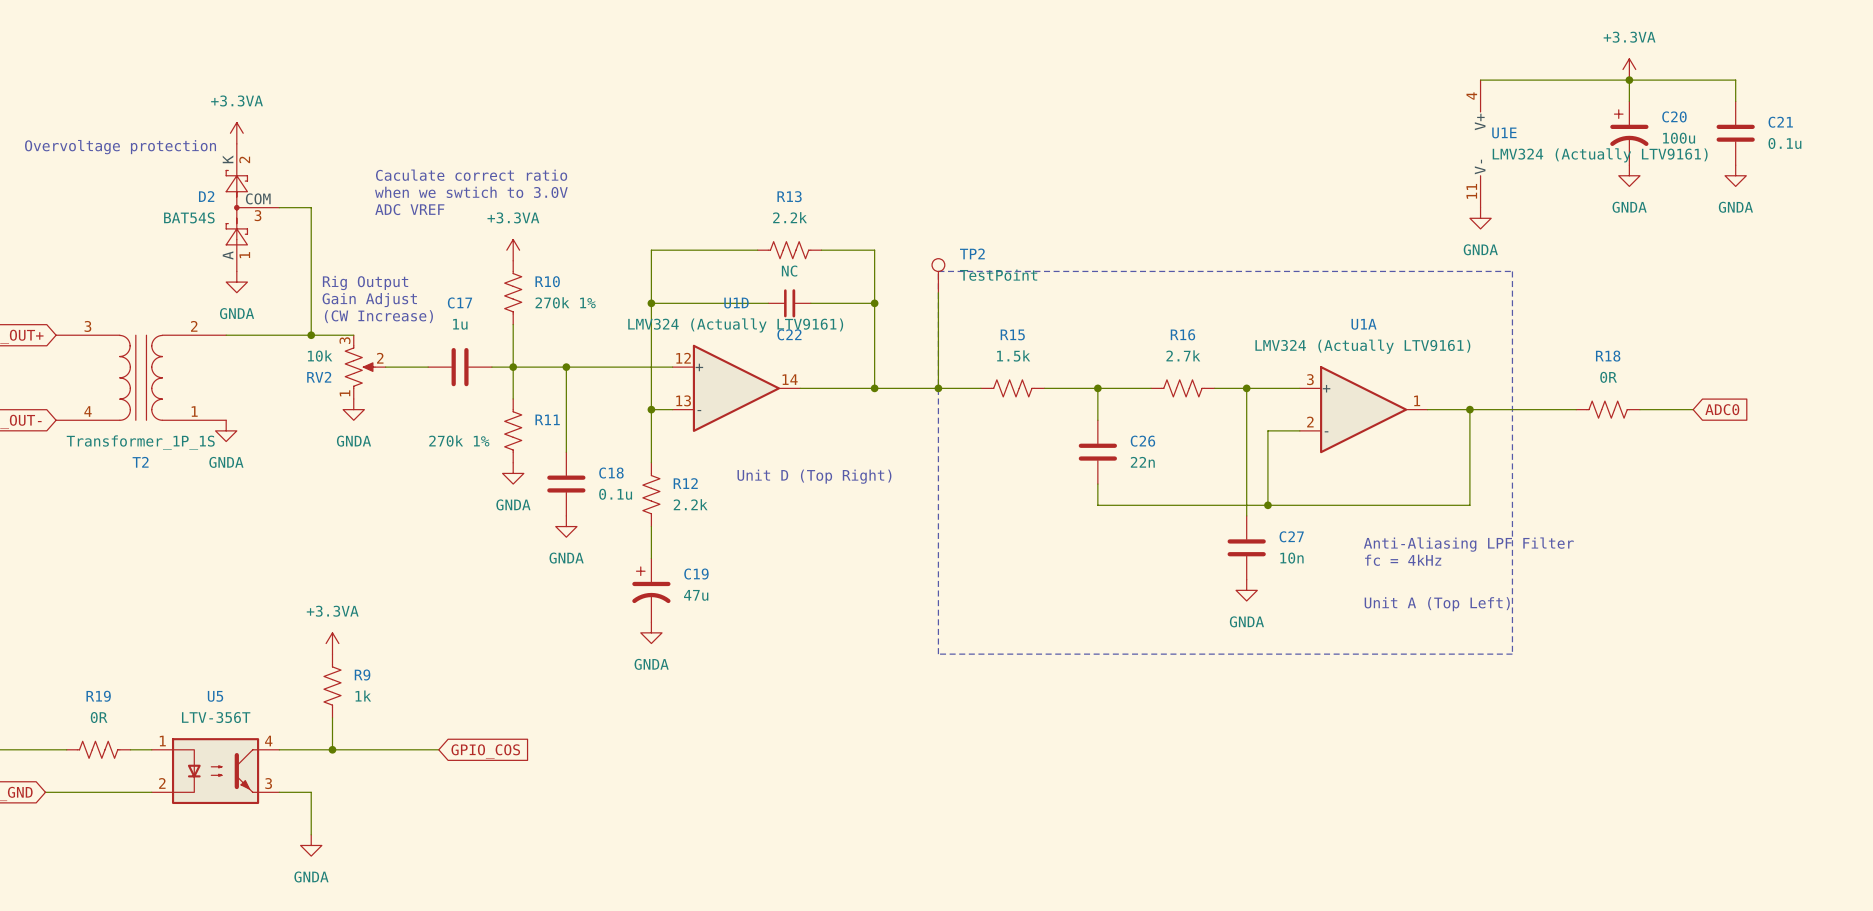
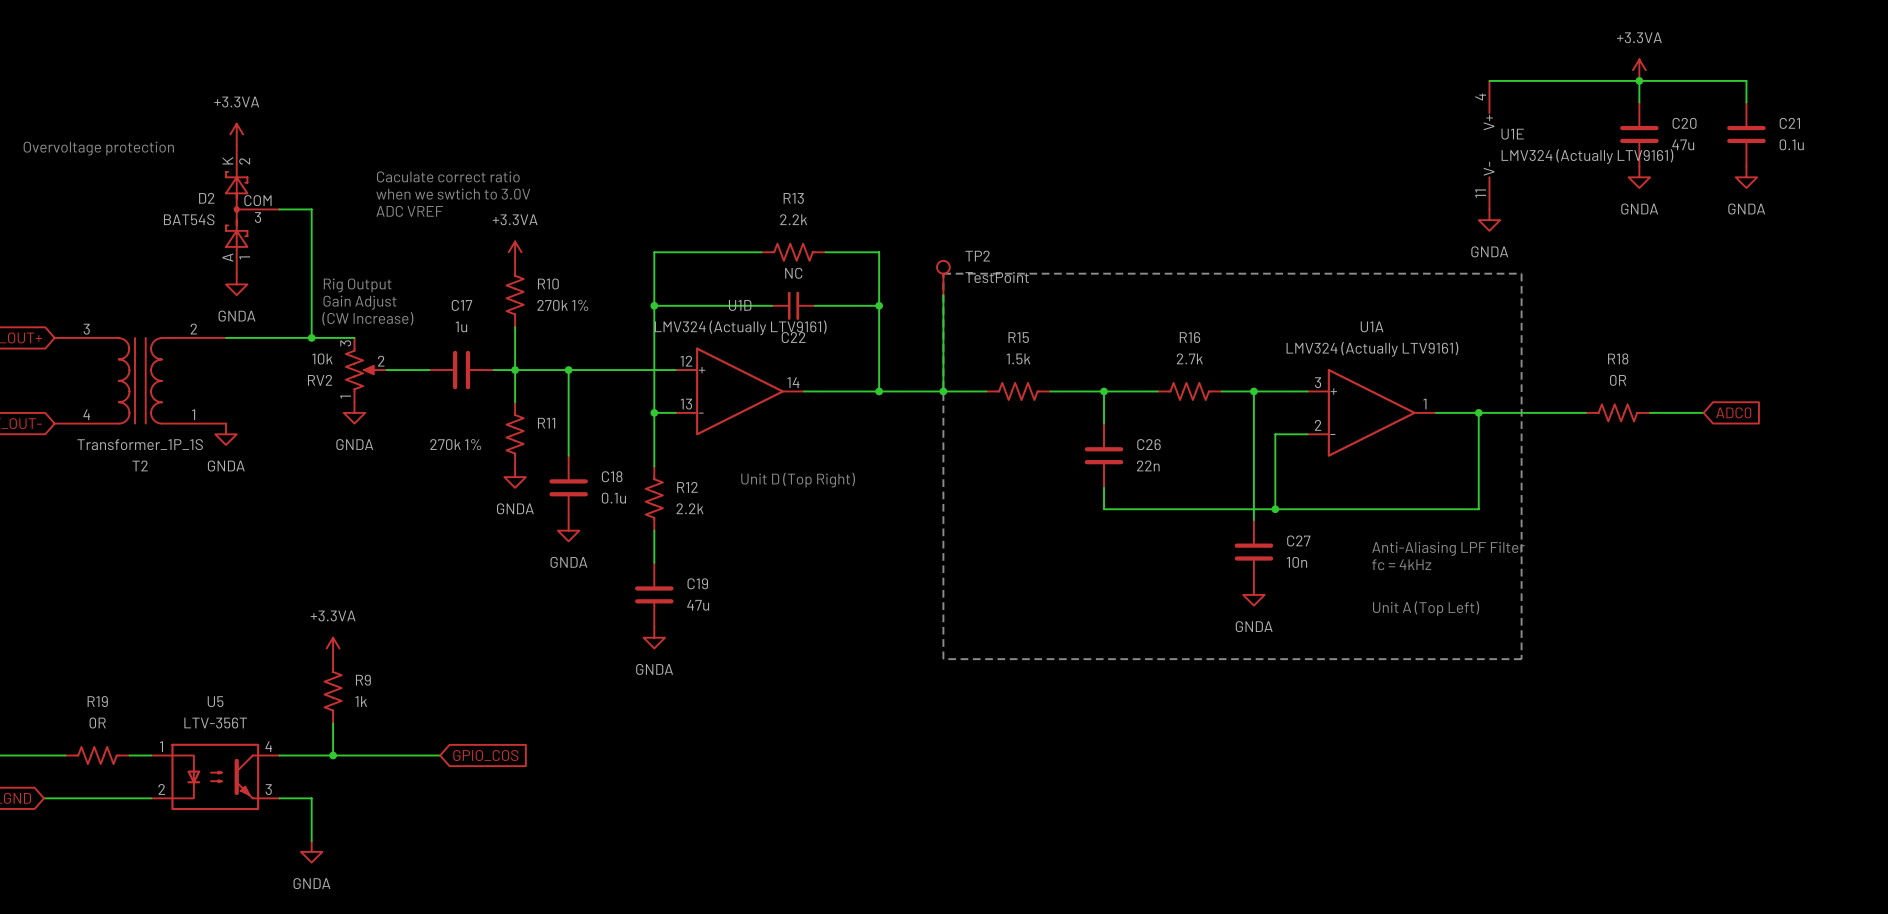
C20 symbol: [1610, 101, 1649, 166] -> [1620, 102, 1659, 167]
C20 value: 100u (1679, 138) -> 47u (1683, 144)
C19 symbol: [632, 558, 671, 623] -> [635, 562, 674, 628]

